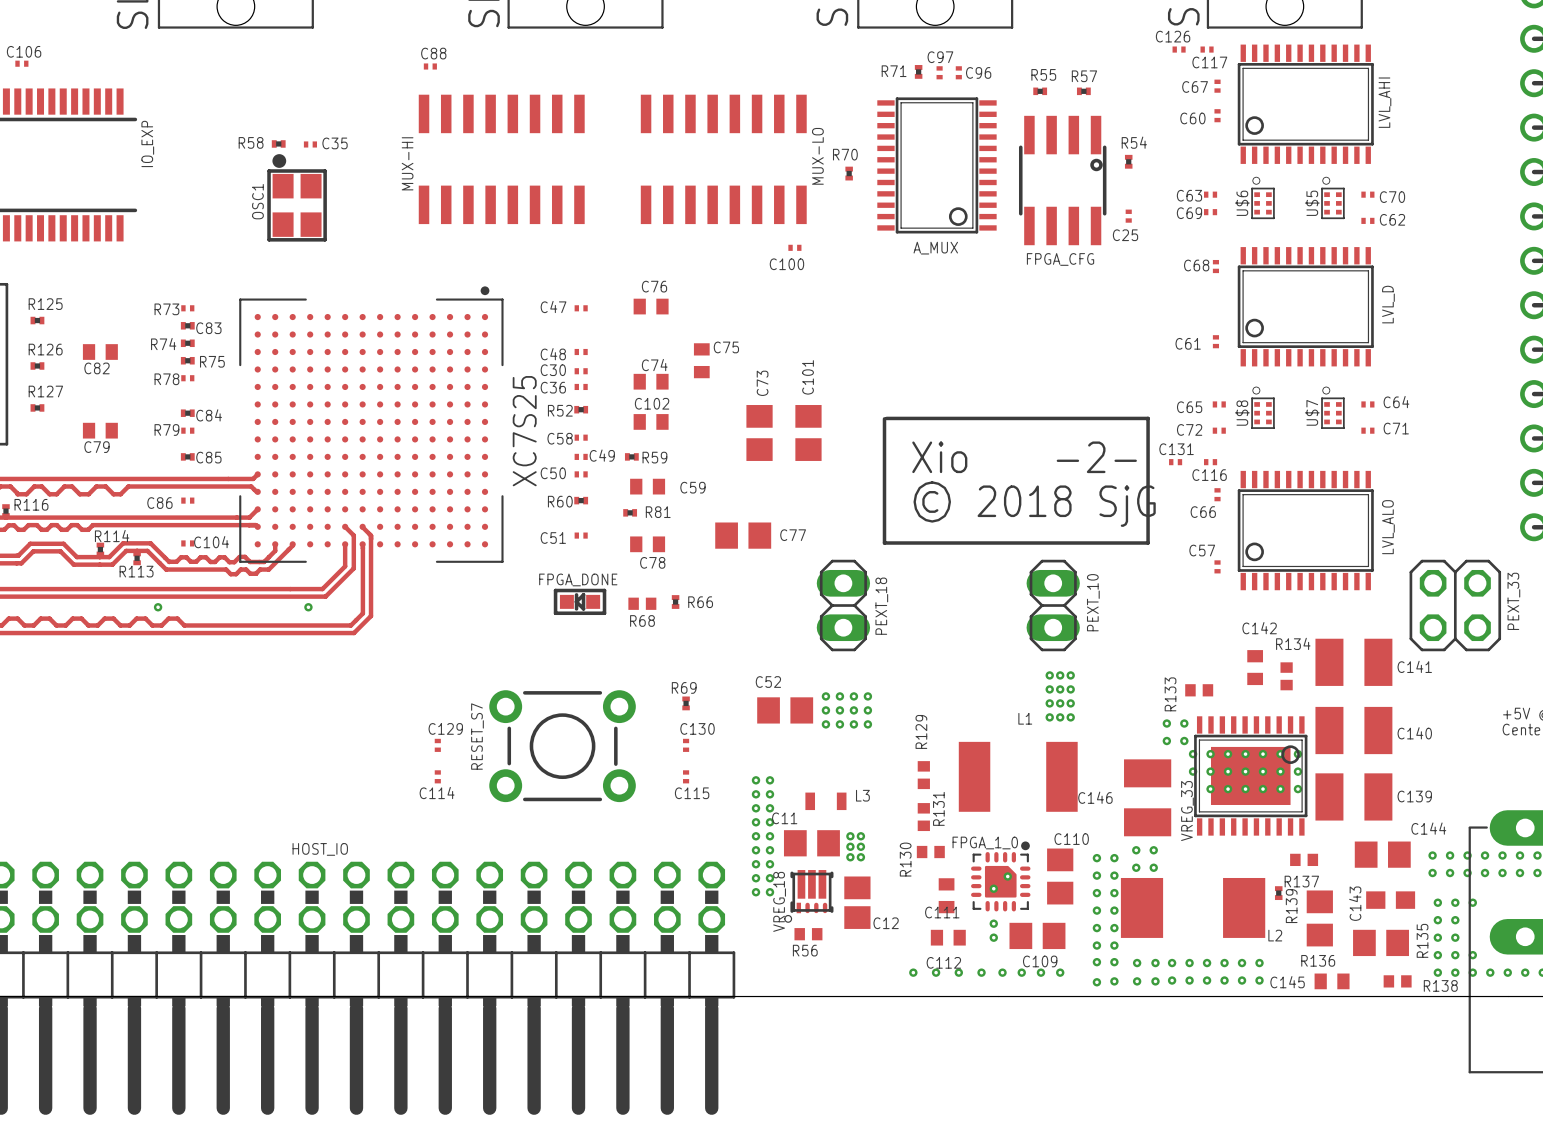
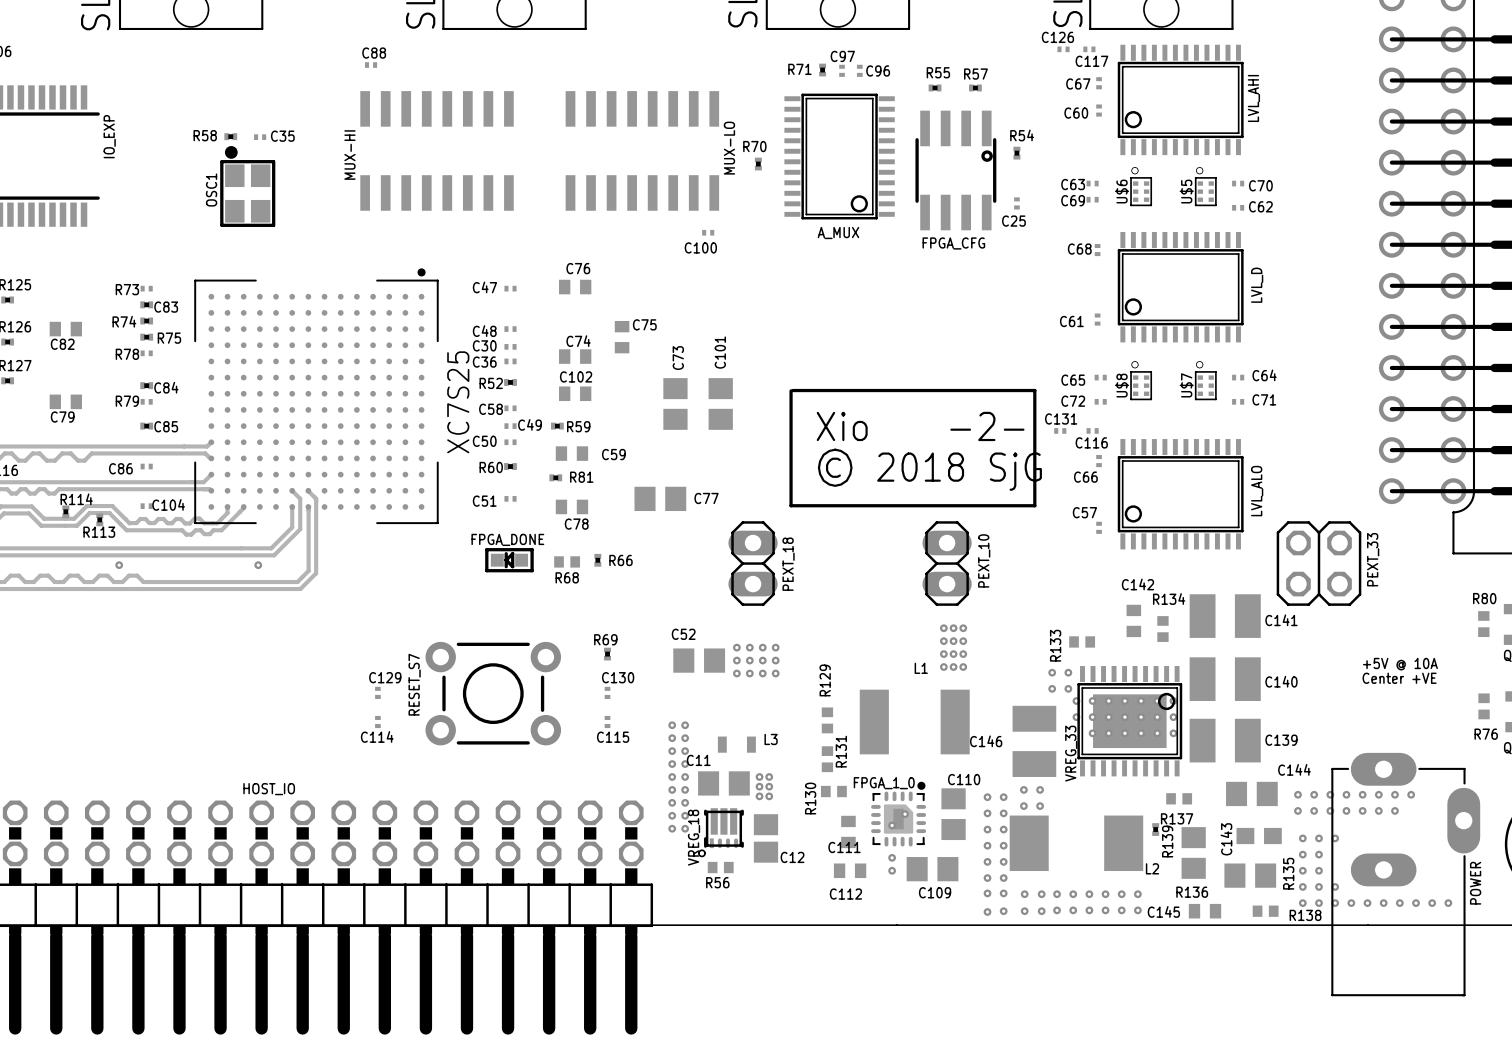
via: (913, 972) -> none
via: (936, 972) -> none
via: (958, 972) -> none
via: (981, 972) -> none
via: (1002, 972) -> none
via: (1021, 972) -> none
via: (1040, 972) -> none
via: (1060, 972) -> none

